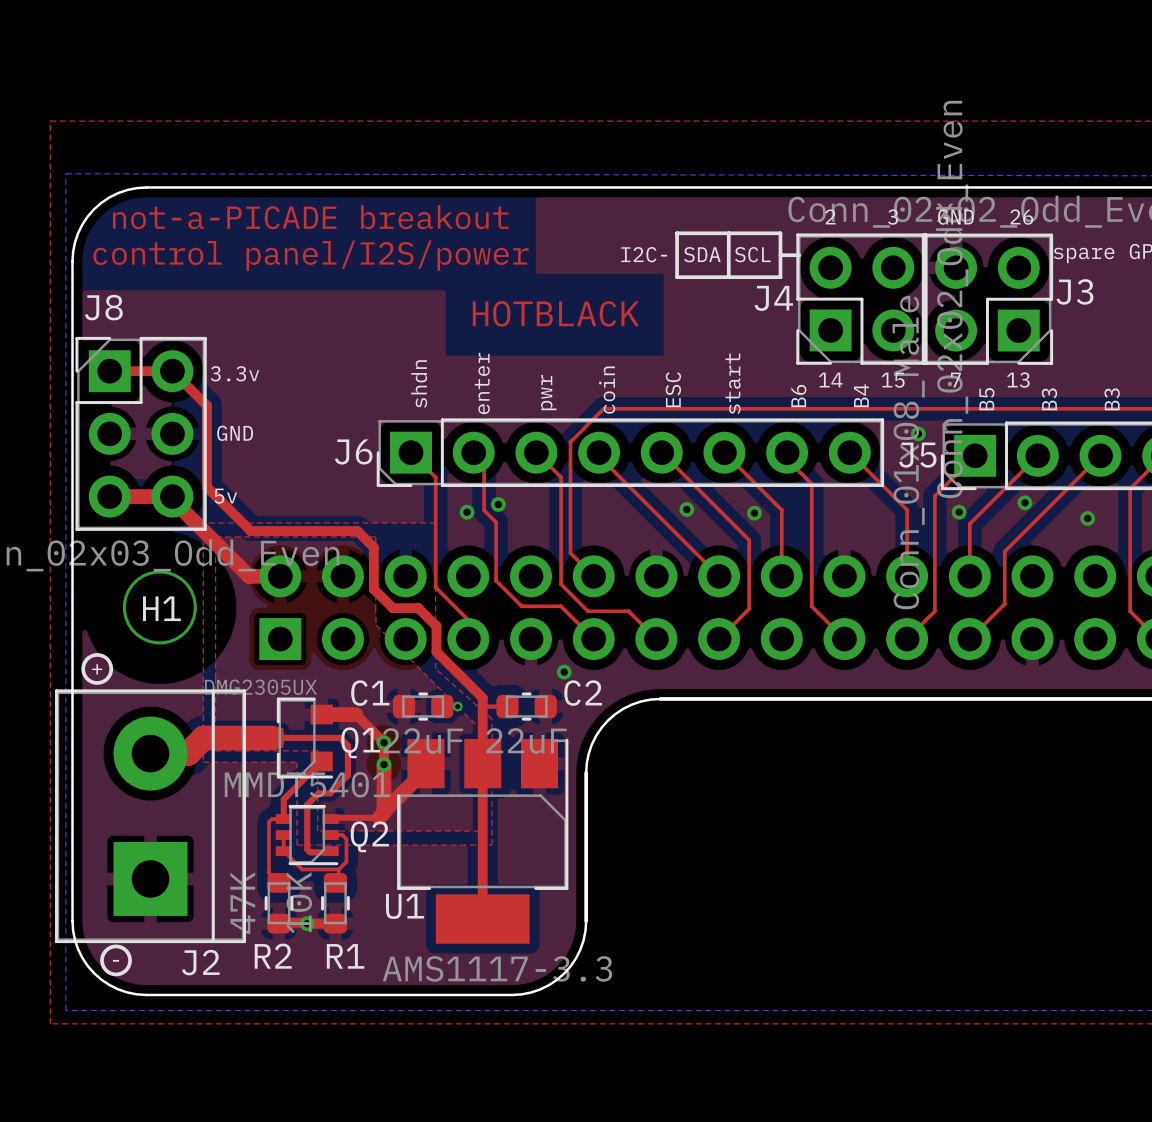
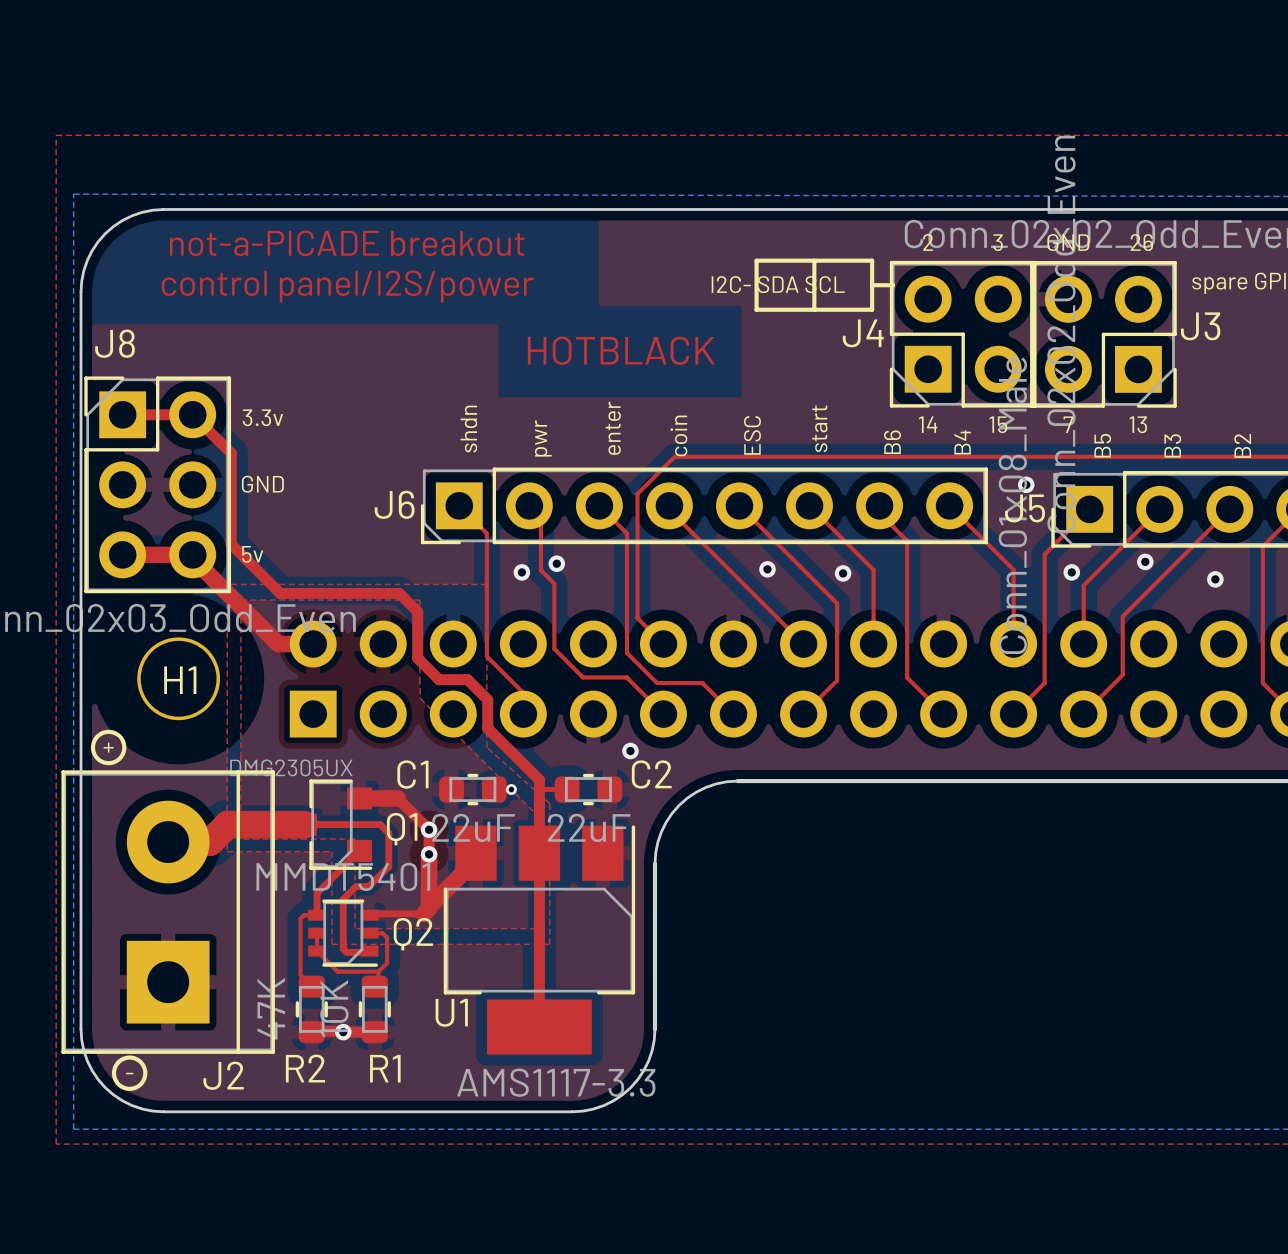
text: enter (482, 383) -> pwr (543, 438)
text: pwr (548, 392) -> enter (613, 428)
text: B3 (1112, 399) -> B2 (1242, 445)

